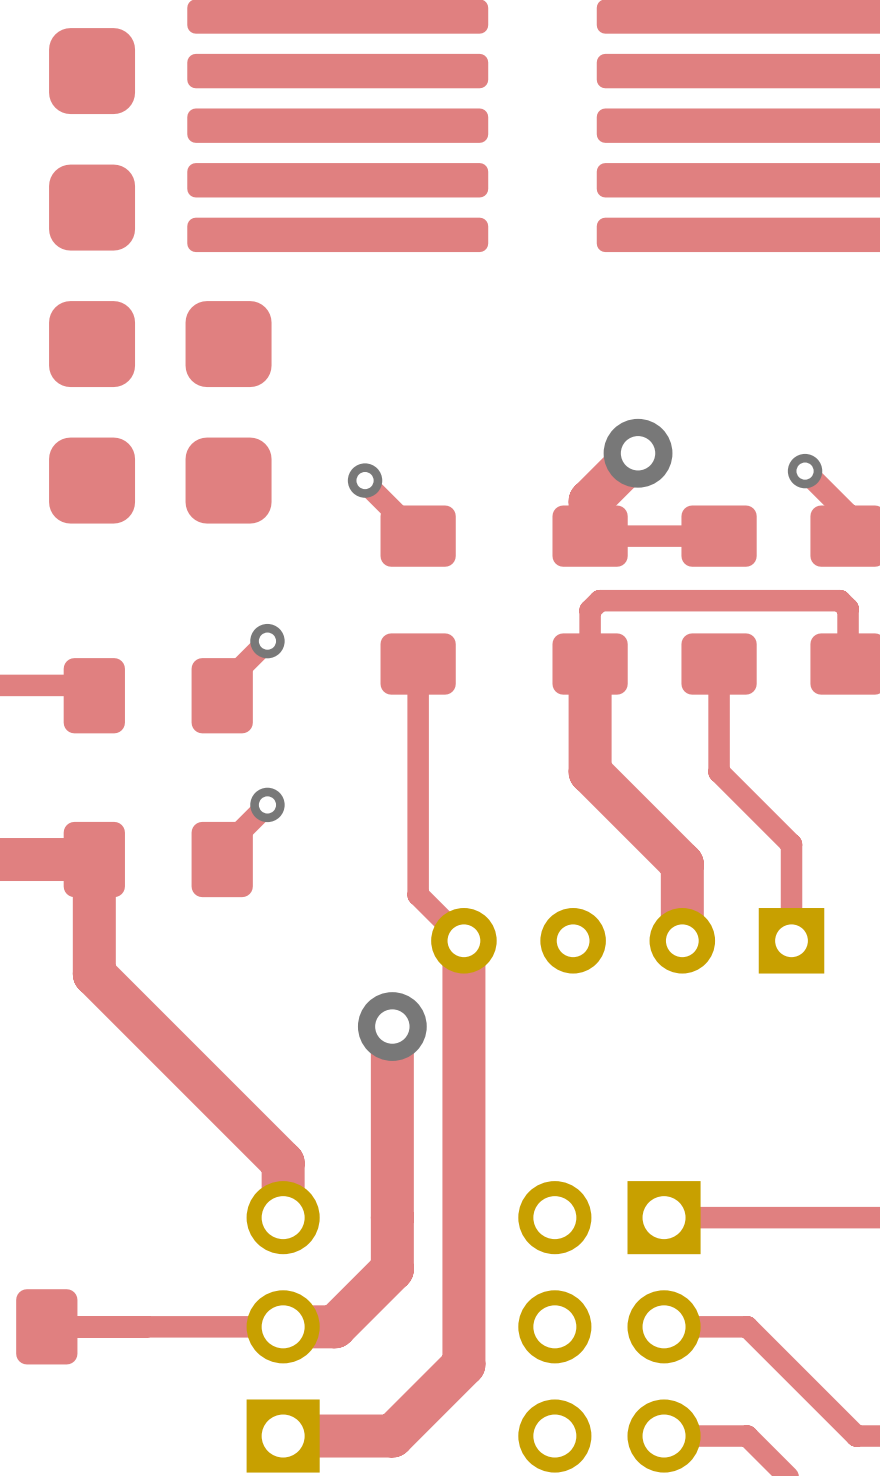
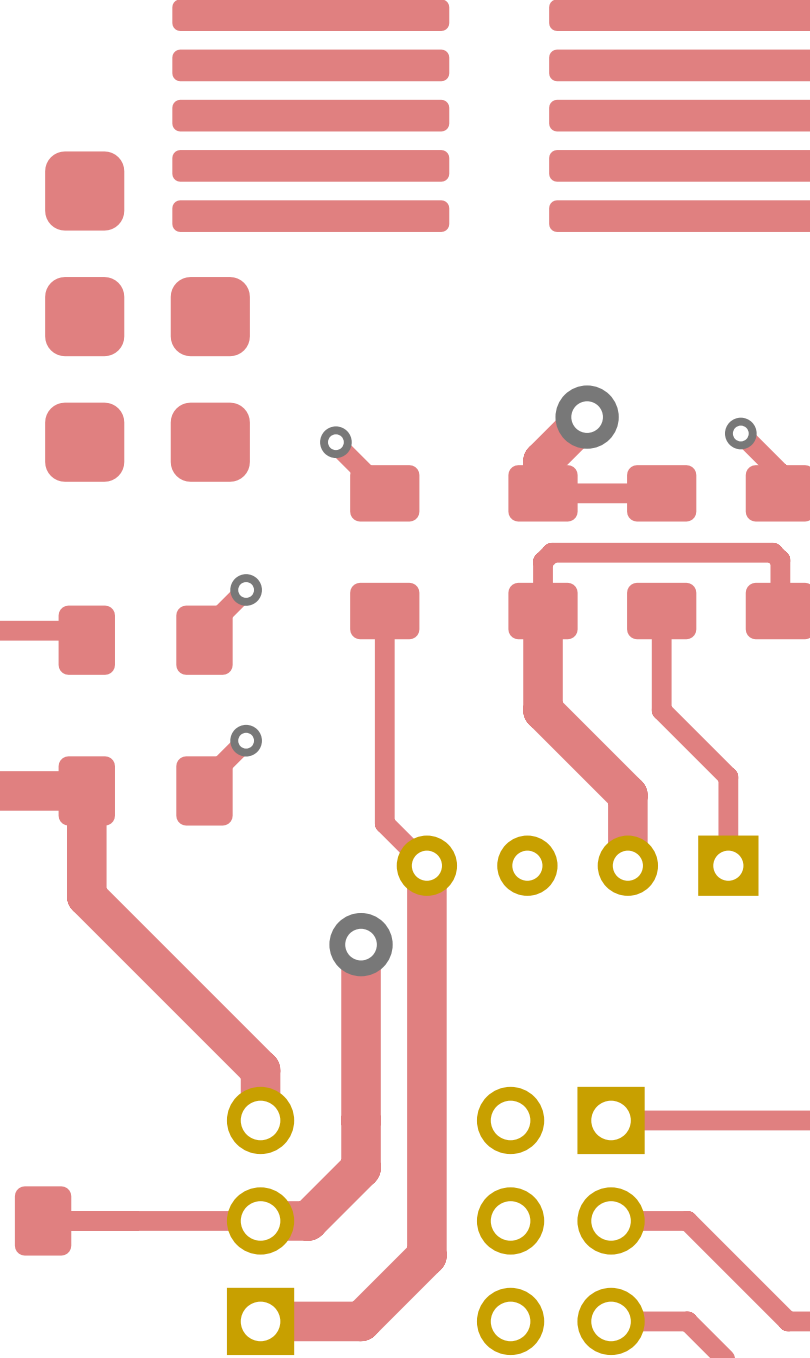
part: (92, 71) -> none

